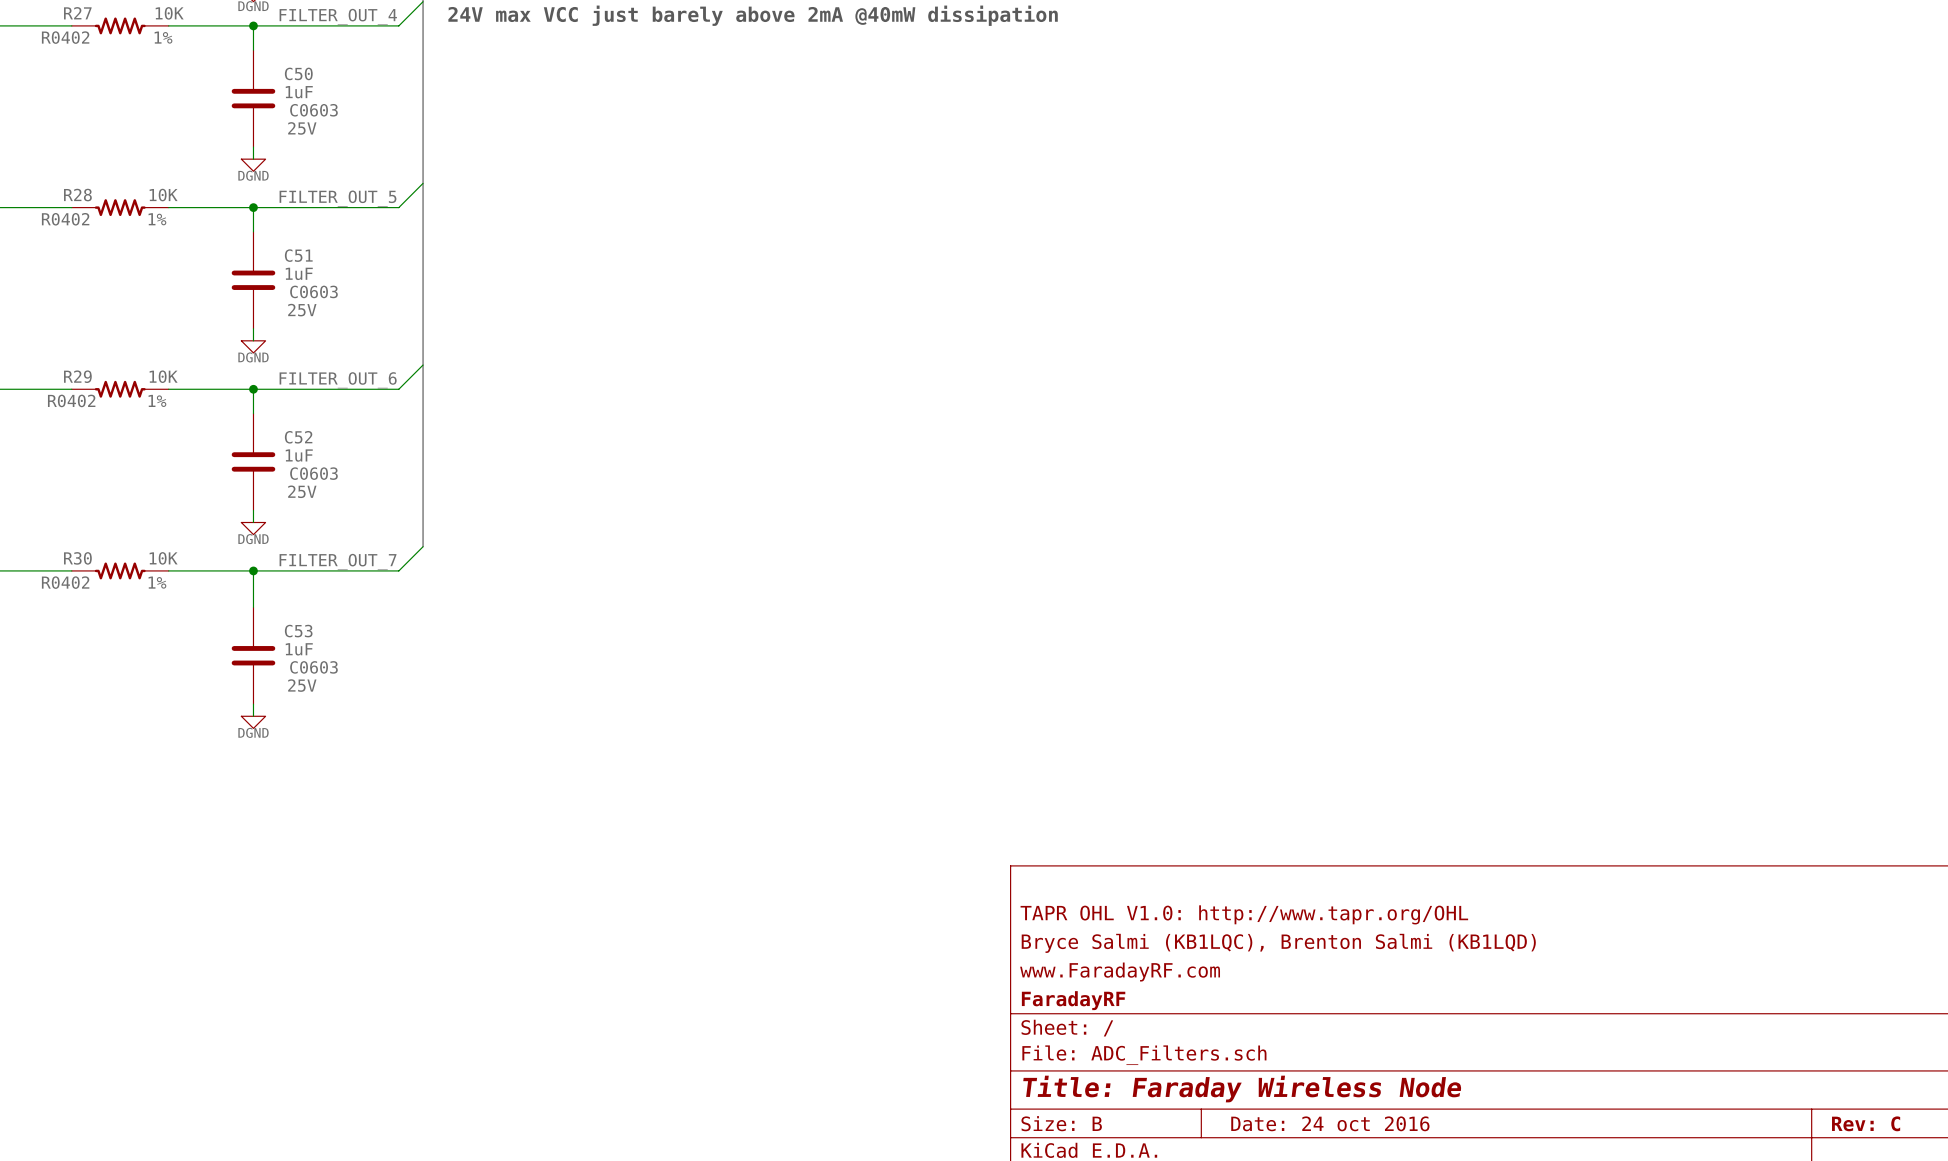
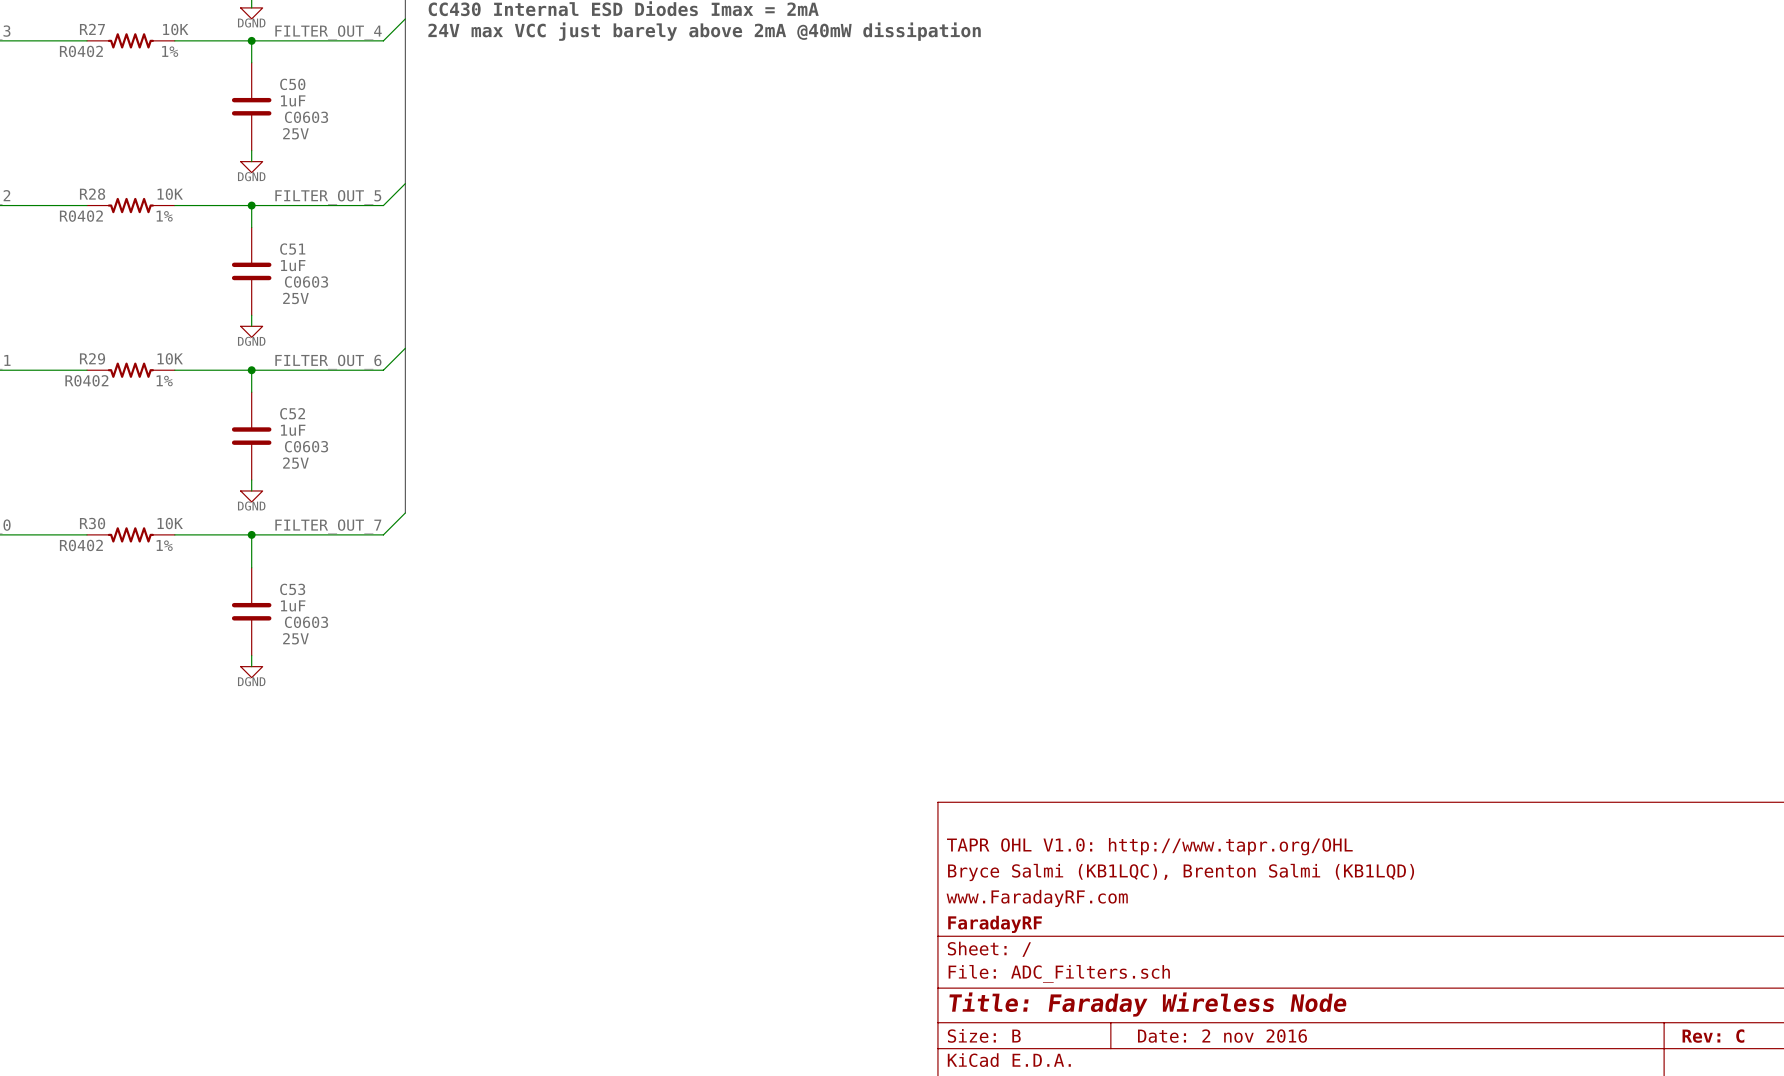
title block: Date: 24 oct 2016 (1330, 1123) -> Date: 2 nov 2016 (1222, 1036)

